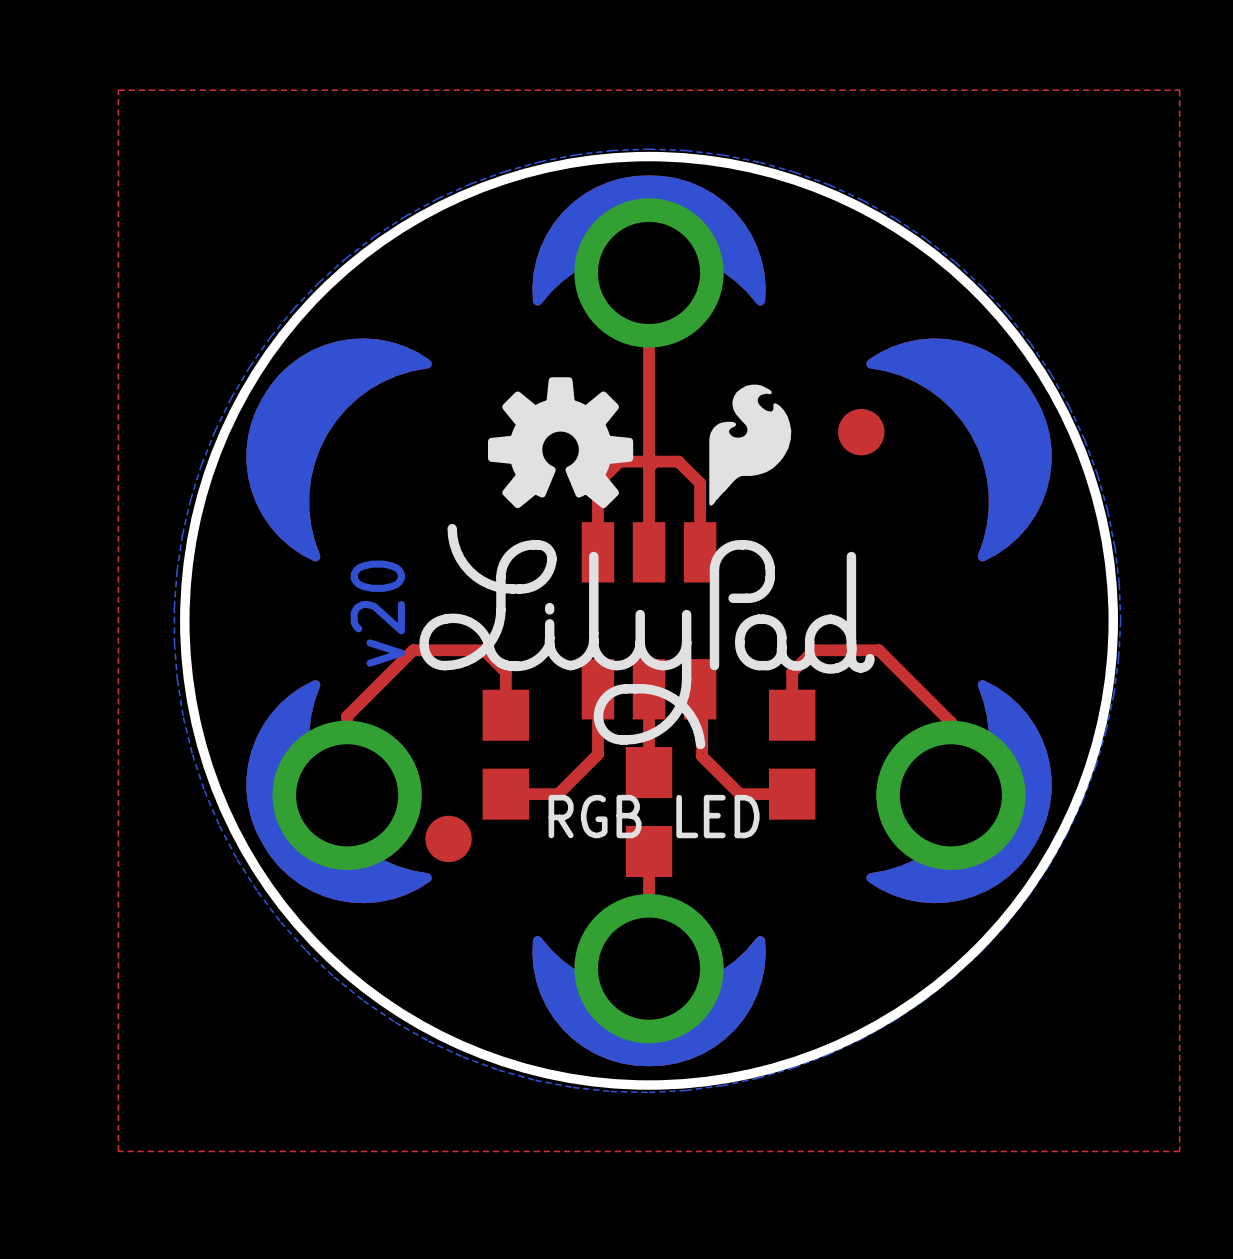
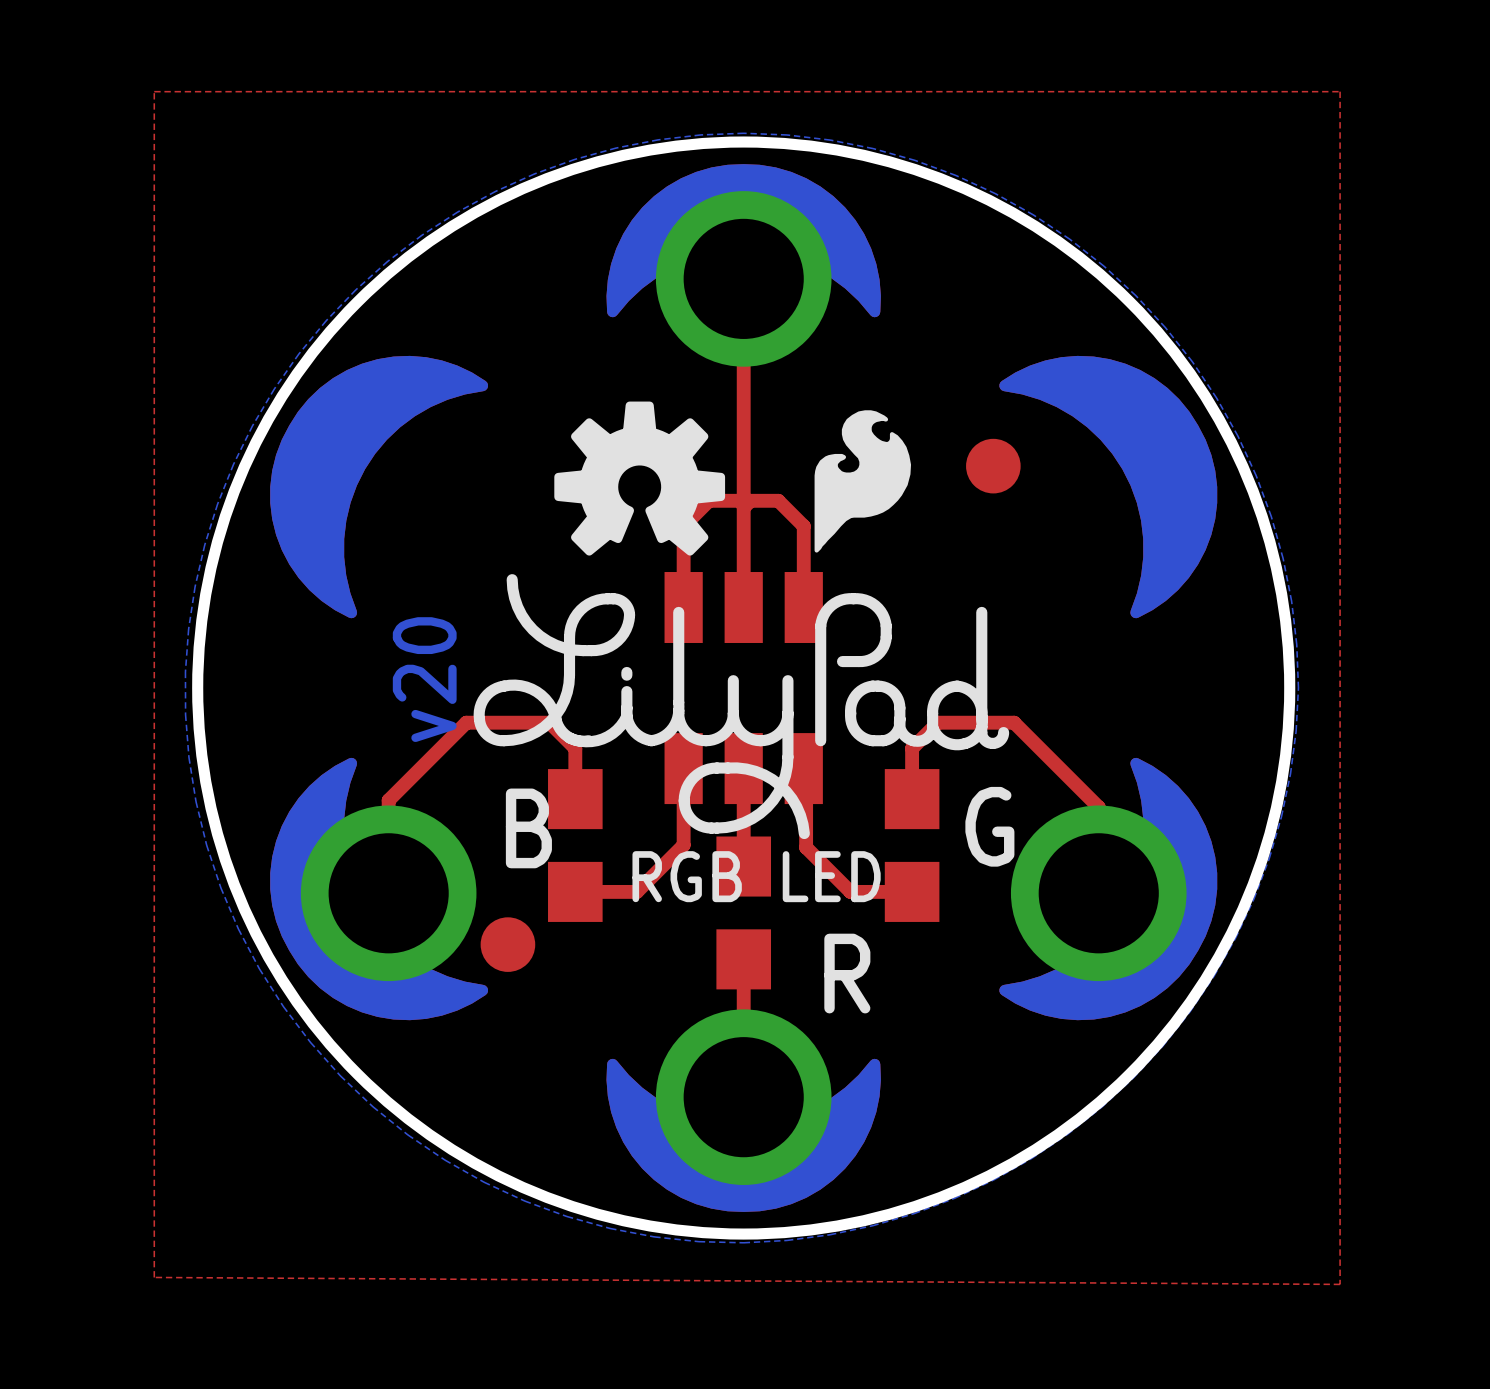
top zone outline: (1179, 90) (1179, 1151) (118, 1151) (118, 90) (1179, 90) -> (1340, 91) (1340, 1284) (154, 1277) (154, 91) (1340, 91)
text: none -> G (989, 826)
text: none -> B (528, 828)
text position: RGB LED (654, 816) -> RGB LED (756, 876)
text: none -> R (847, 973)

